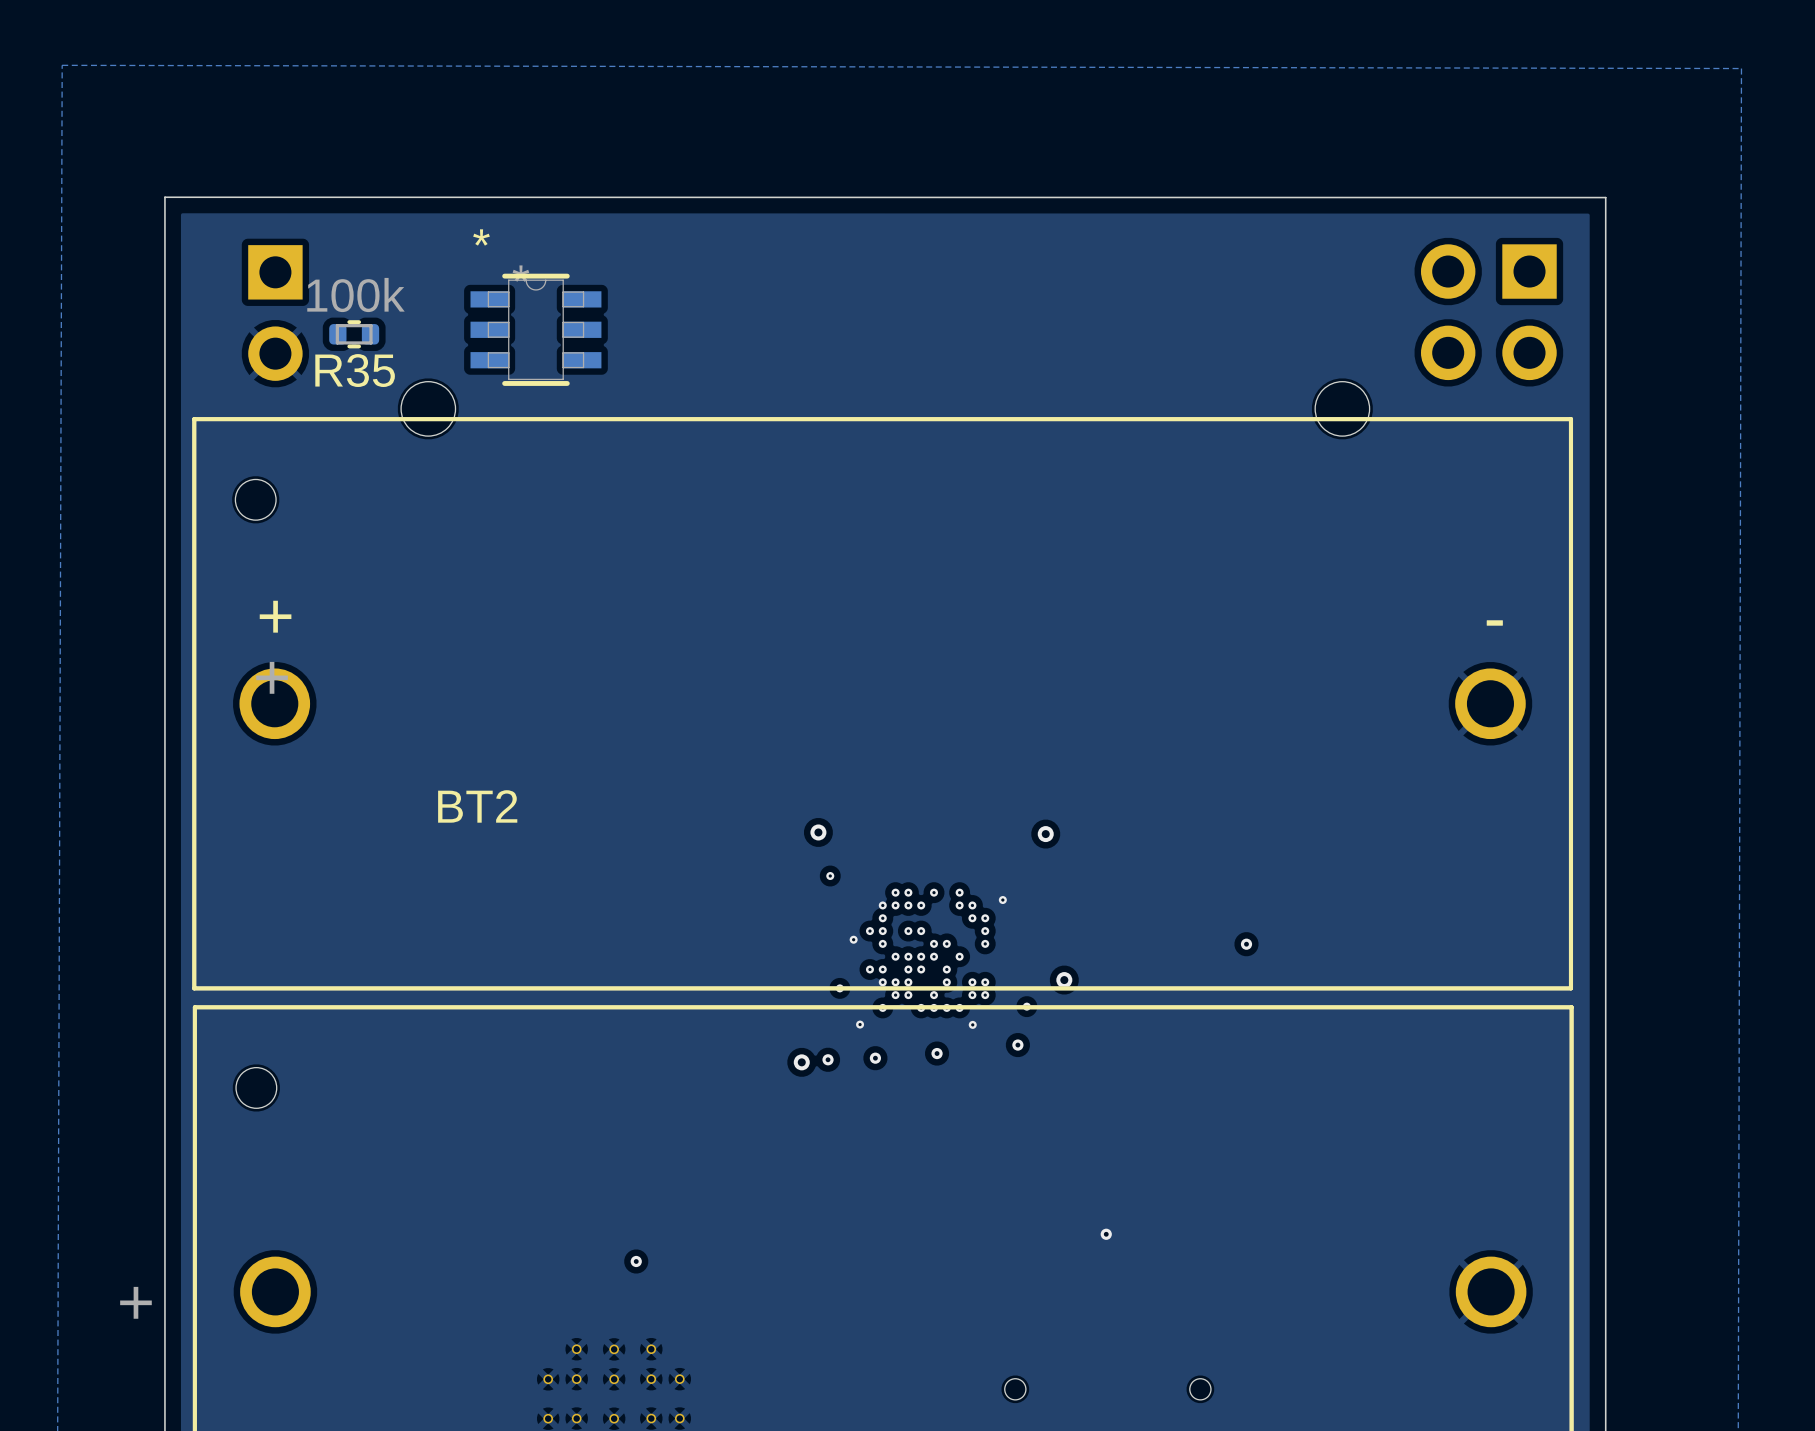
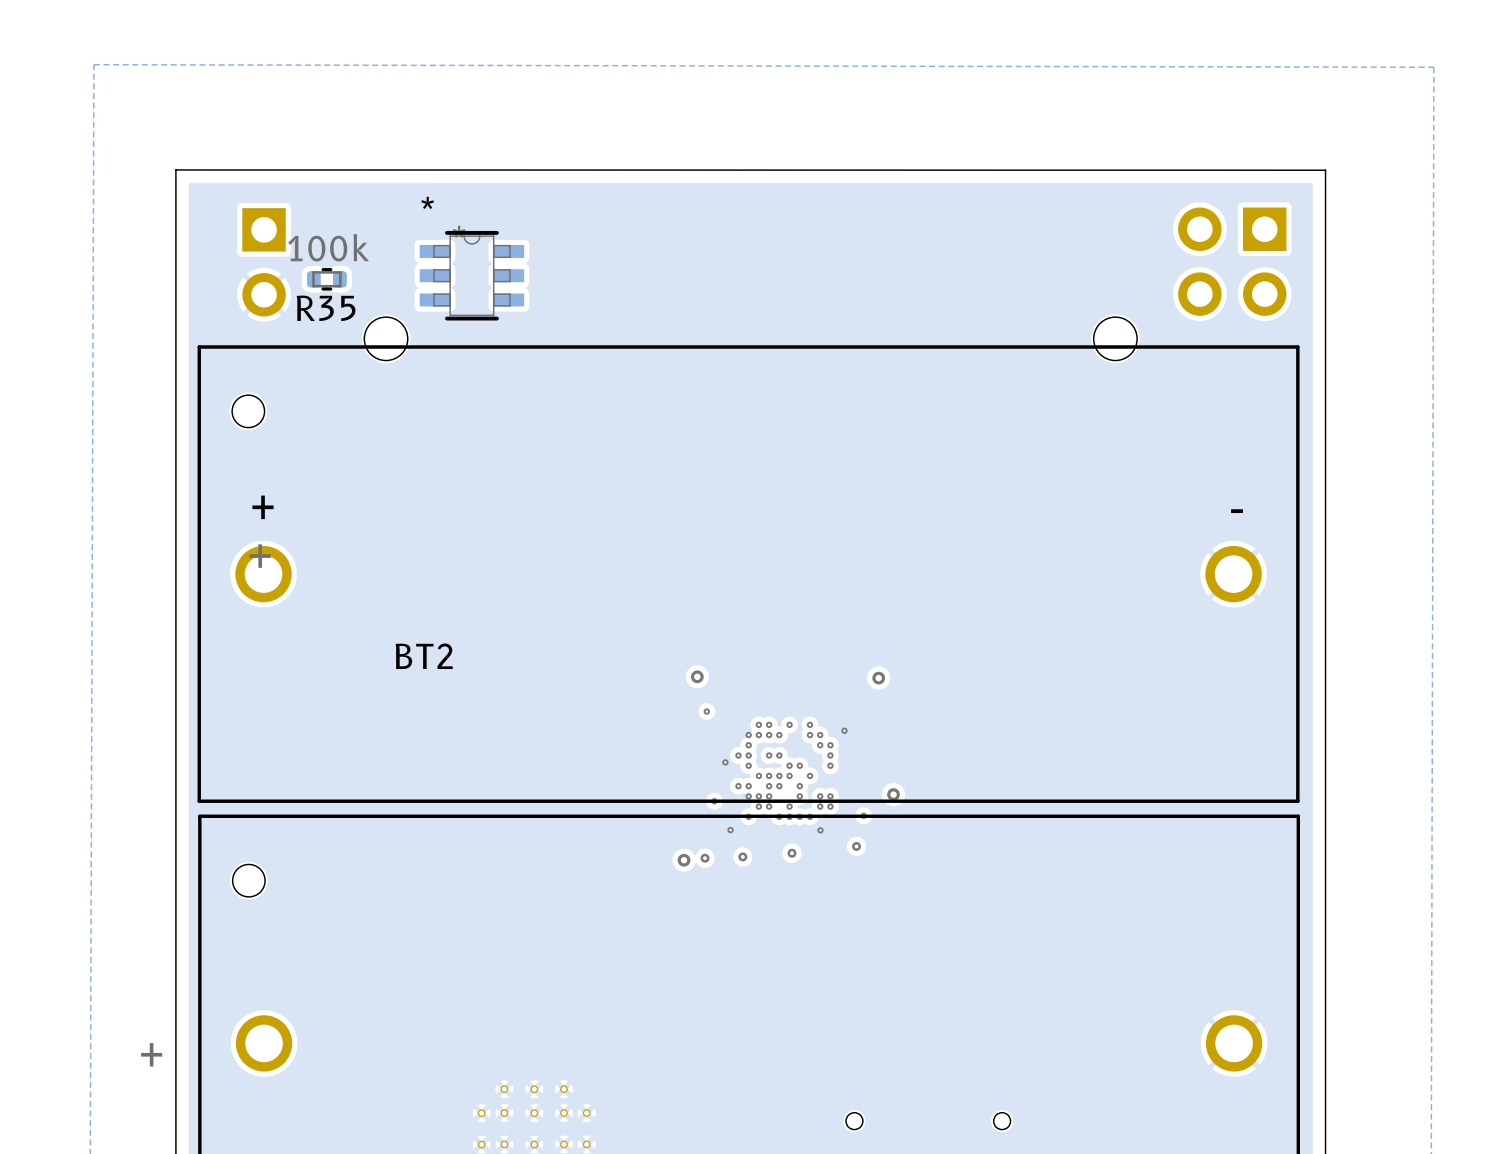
via: (1246, 944) -> none
via: (1106, 1234) -> none
via: (636, 1261) -> none

